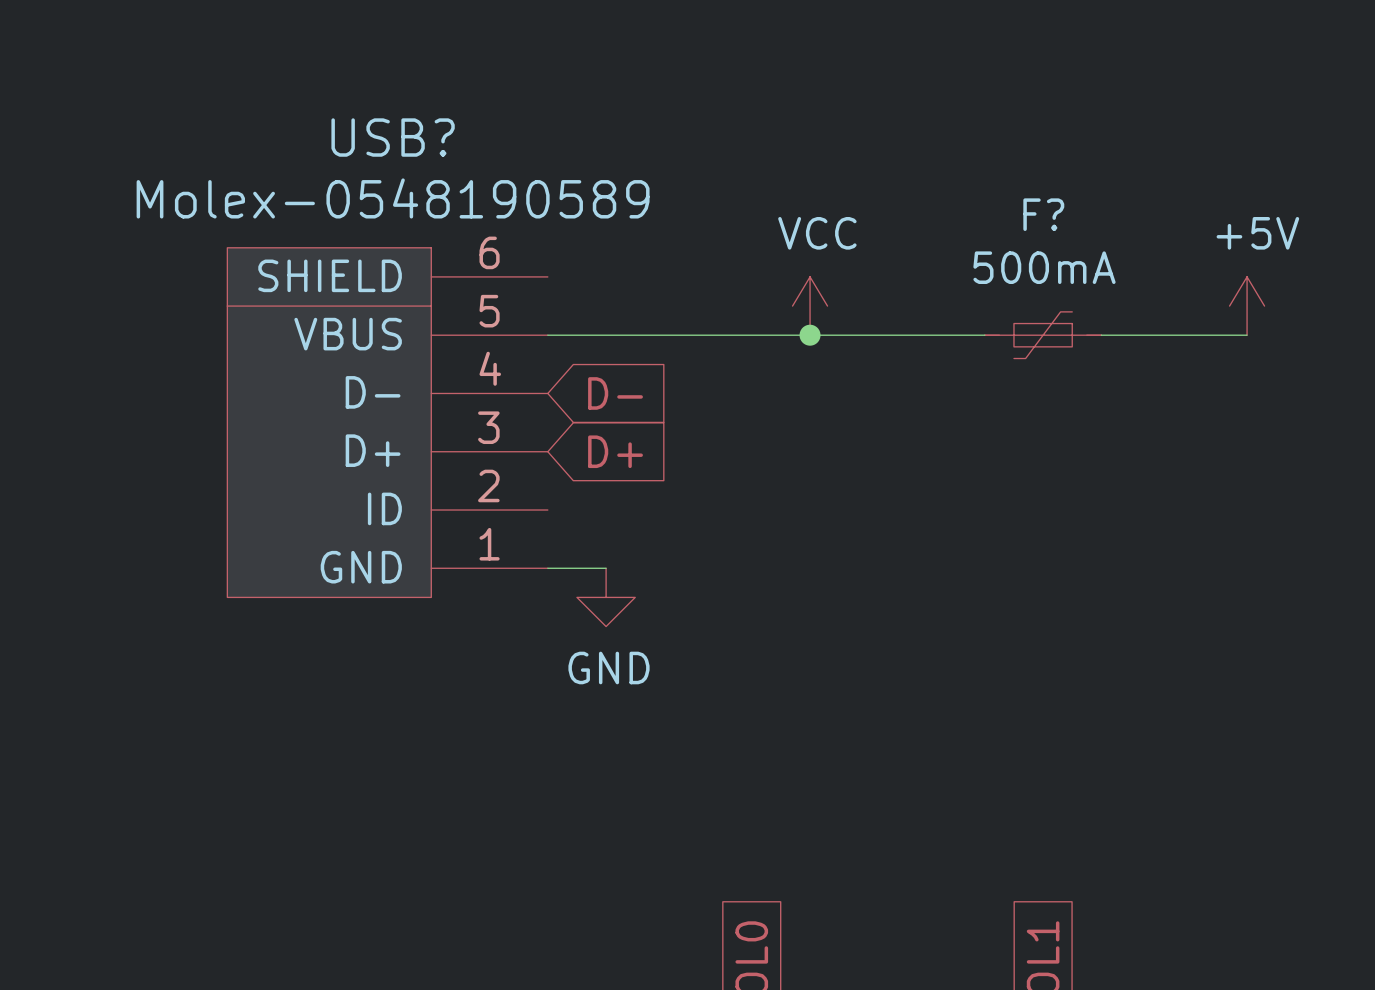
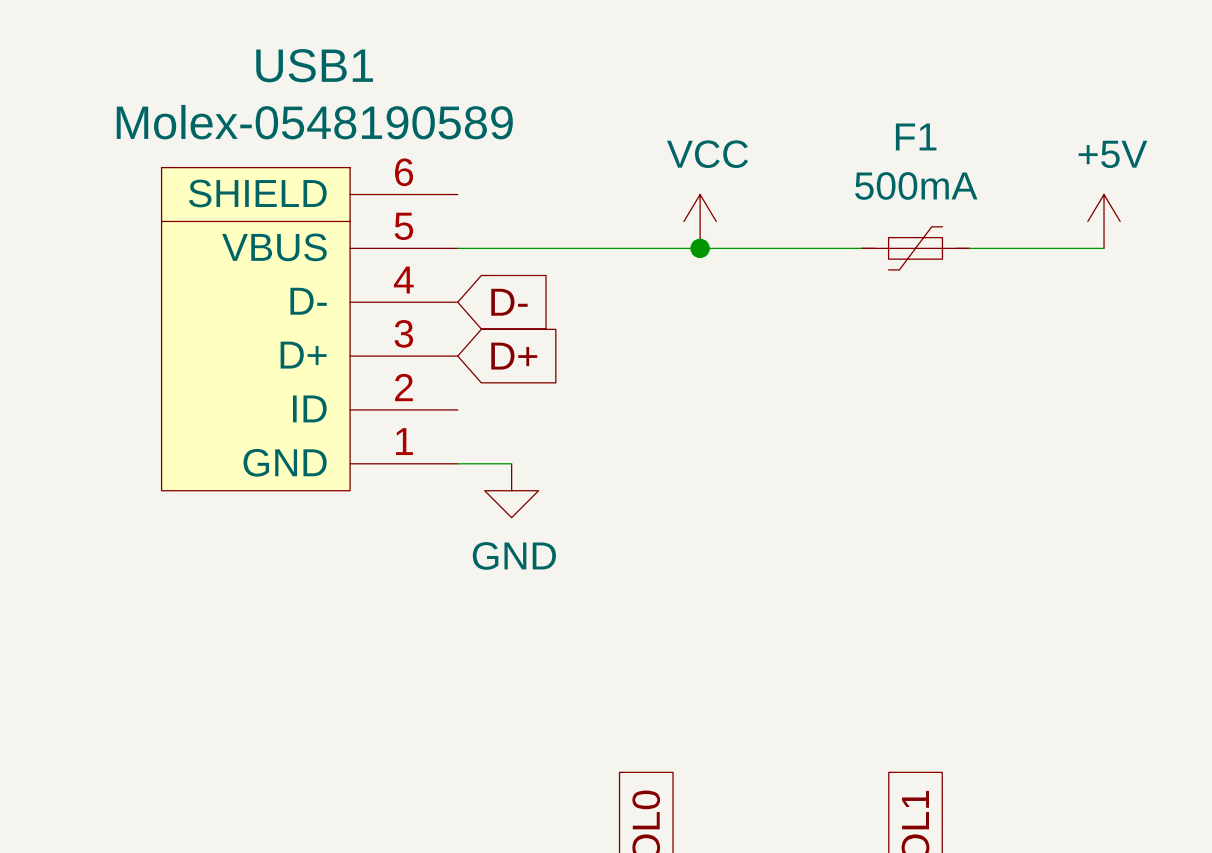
USB? name: USB? (393, 137) -> USB1 (314, 65)
F? name: F? (1043, 214) -> F1 (916, 136)

